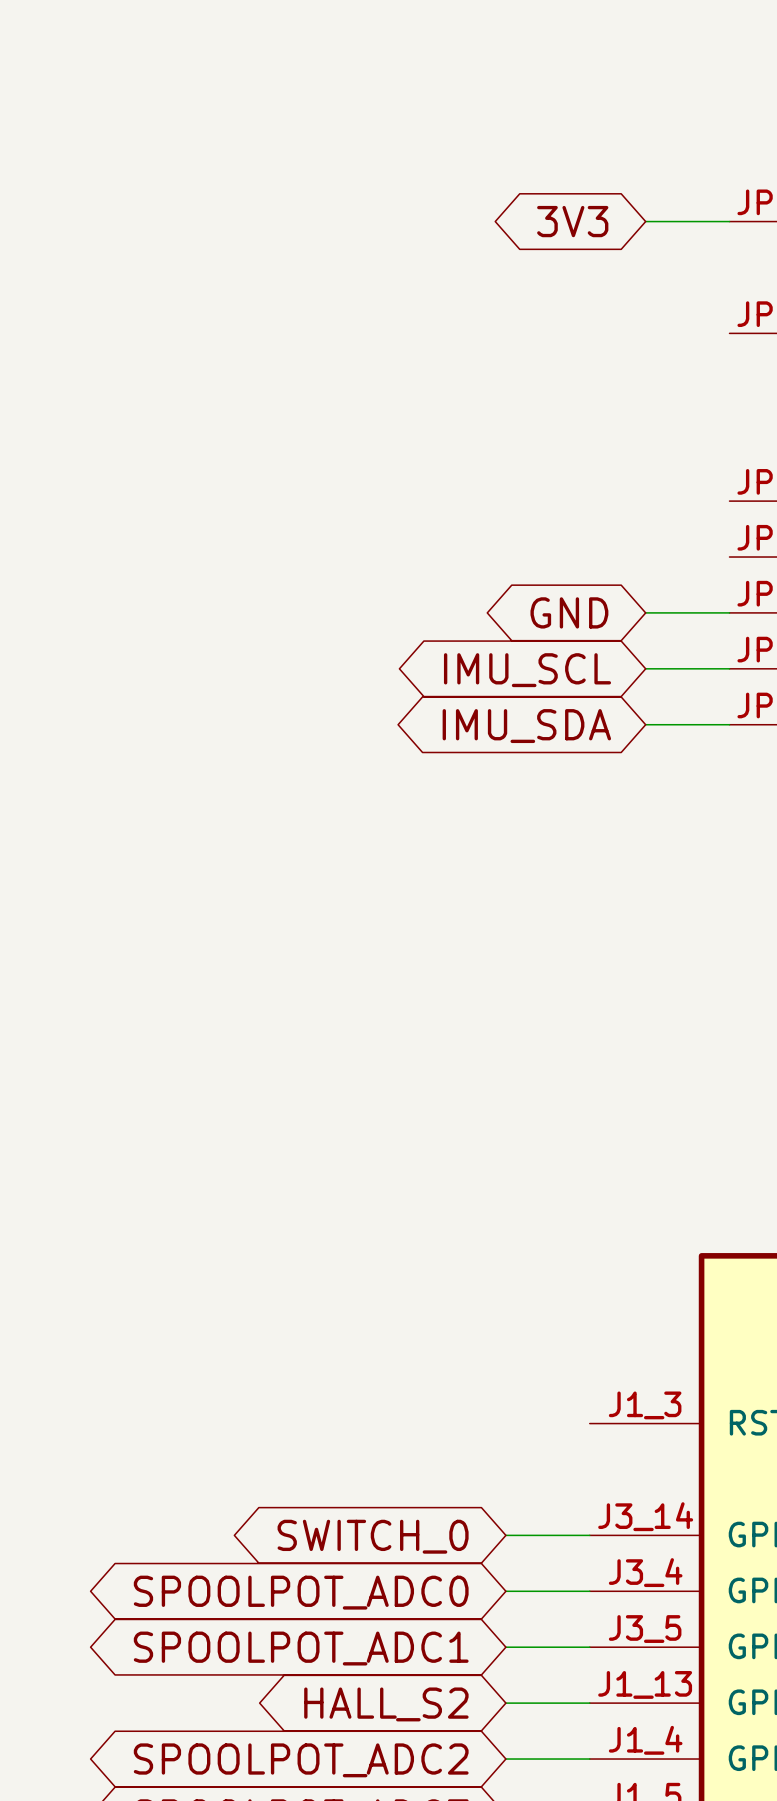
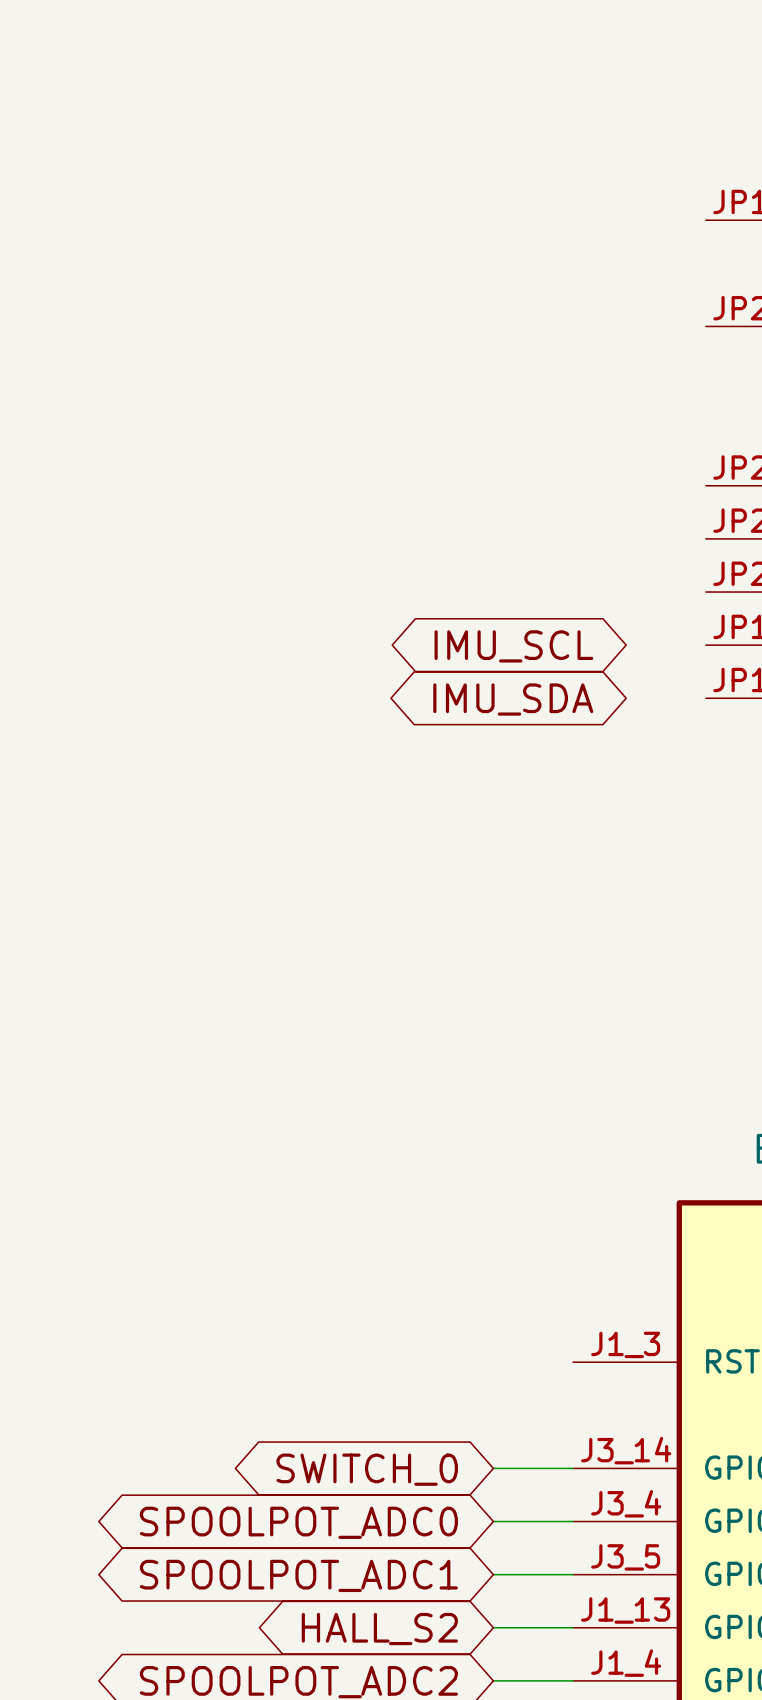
global label: 3V3 (572, 221) -> none
wire: (645, 221) (729, 221) -> none
global label: GND (569, 612) -> none
wire: (645, 612) (729, 612) -> none
wire: (645, 668) (729, 668) -> none
wire: (645, 724) (729, 724) -> none

